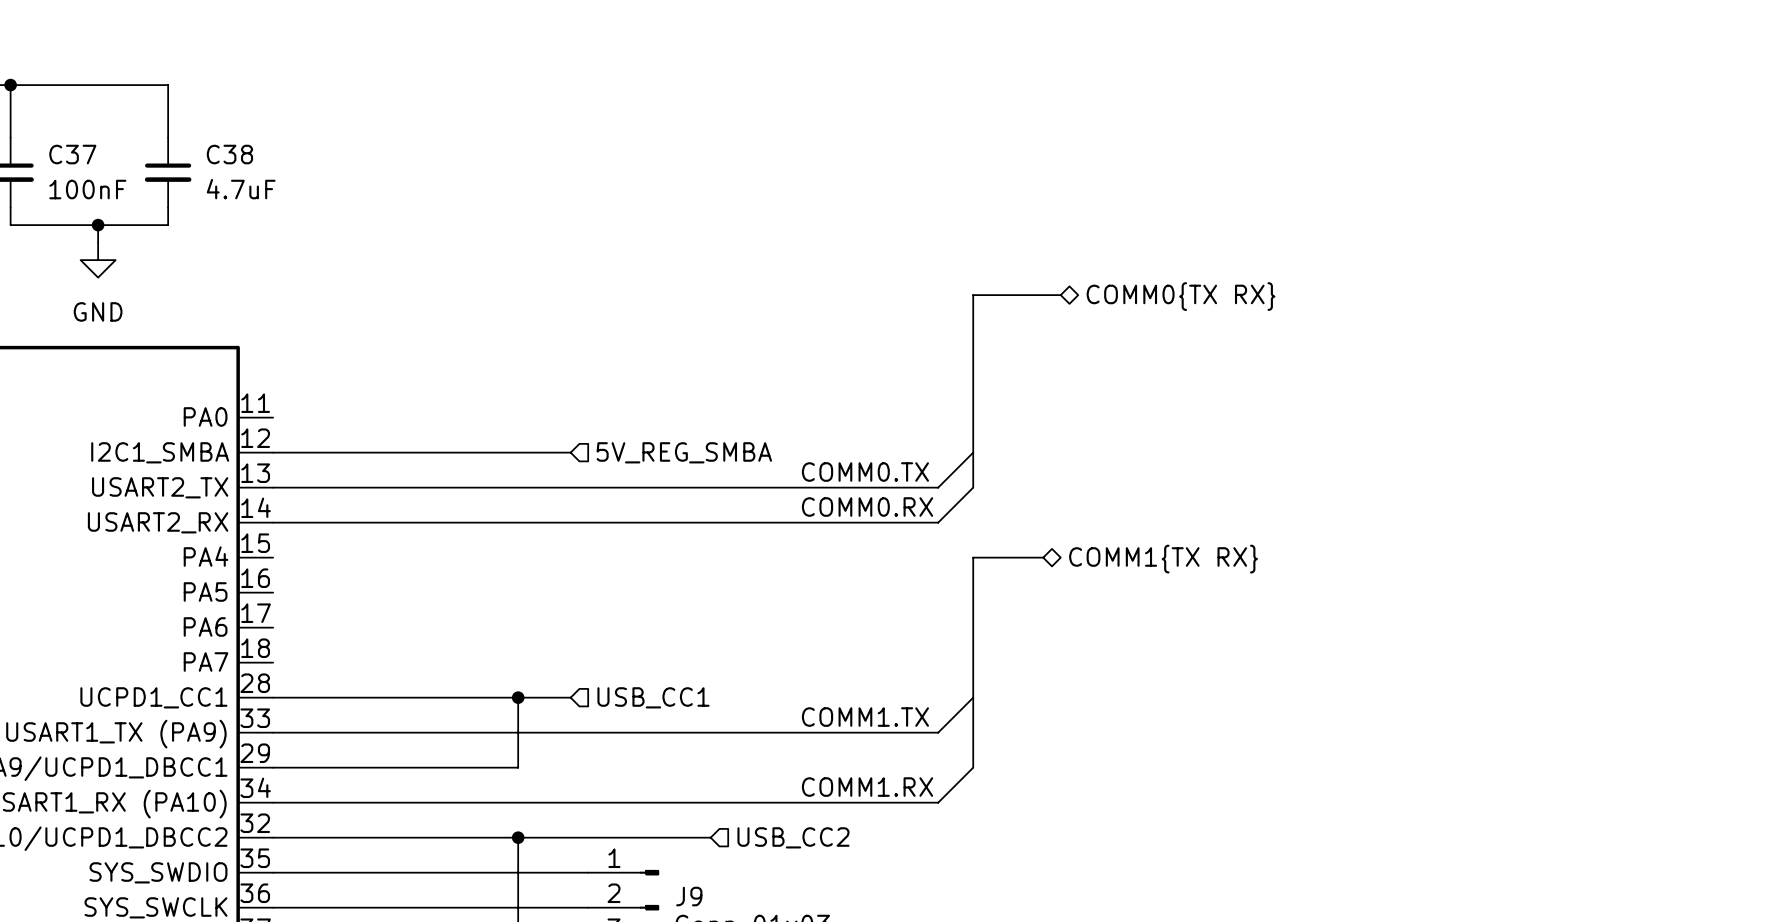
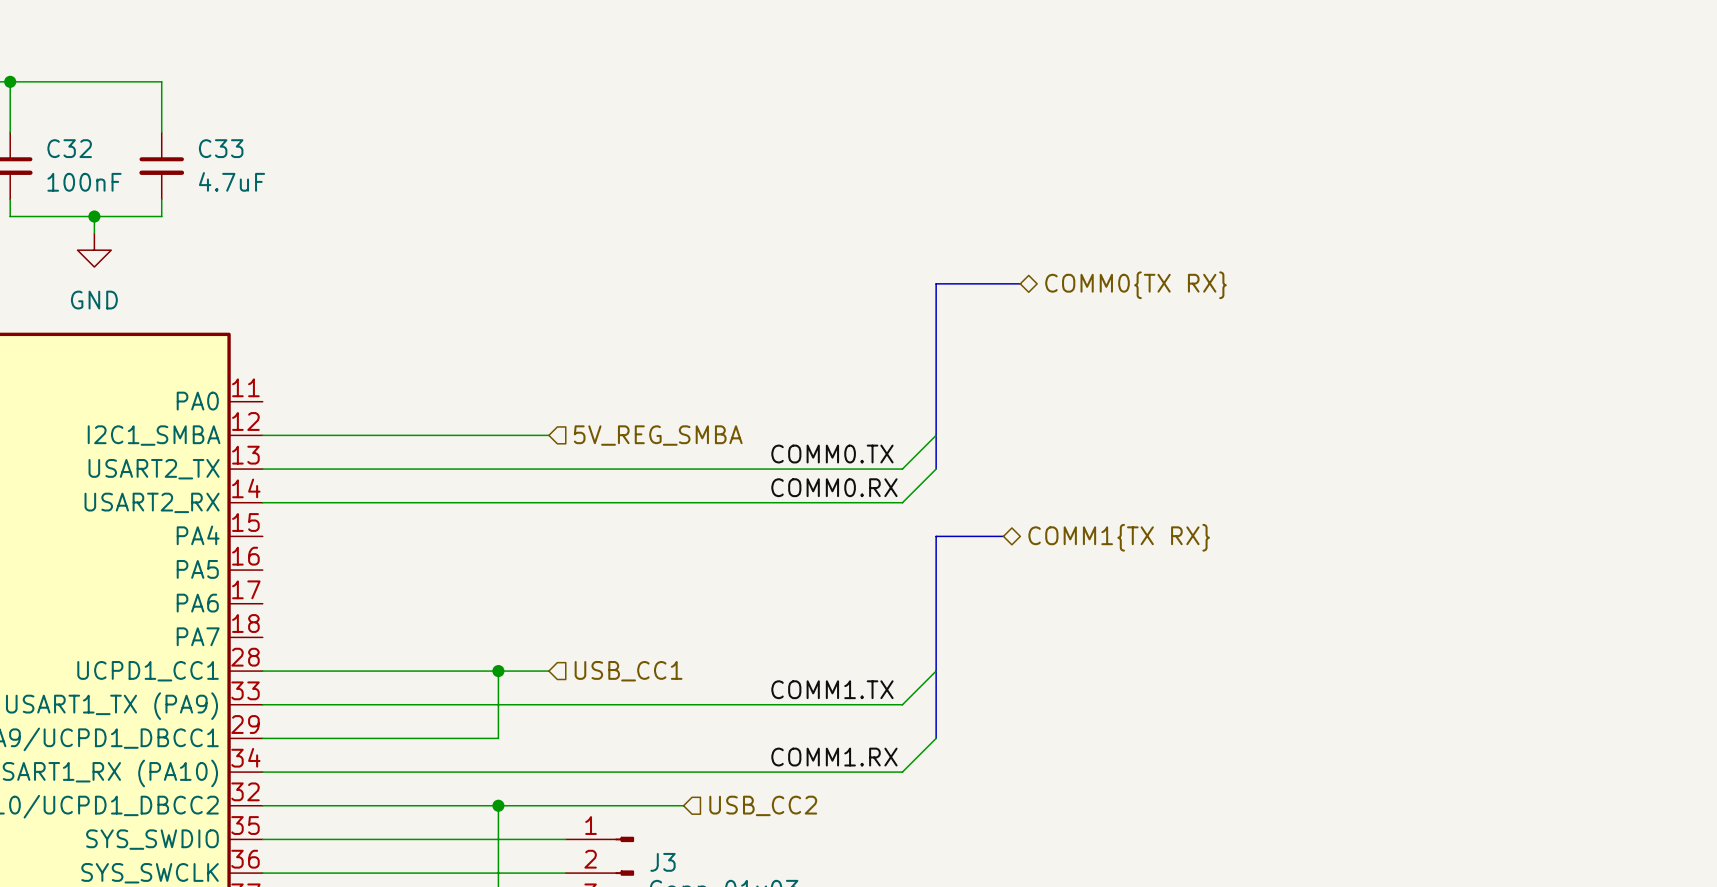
C37 name: C37 (72, 154) -> C32 (69, 148)
C38 name: C38 (229, 154) -> C33 (221, 148)
J9 name: J9 (689, 896) -> J3 (663, 862)

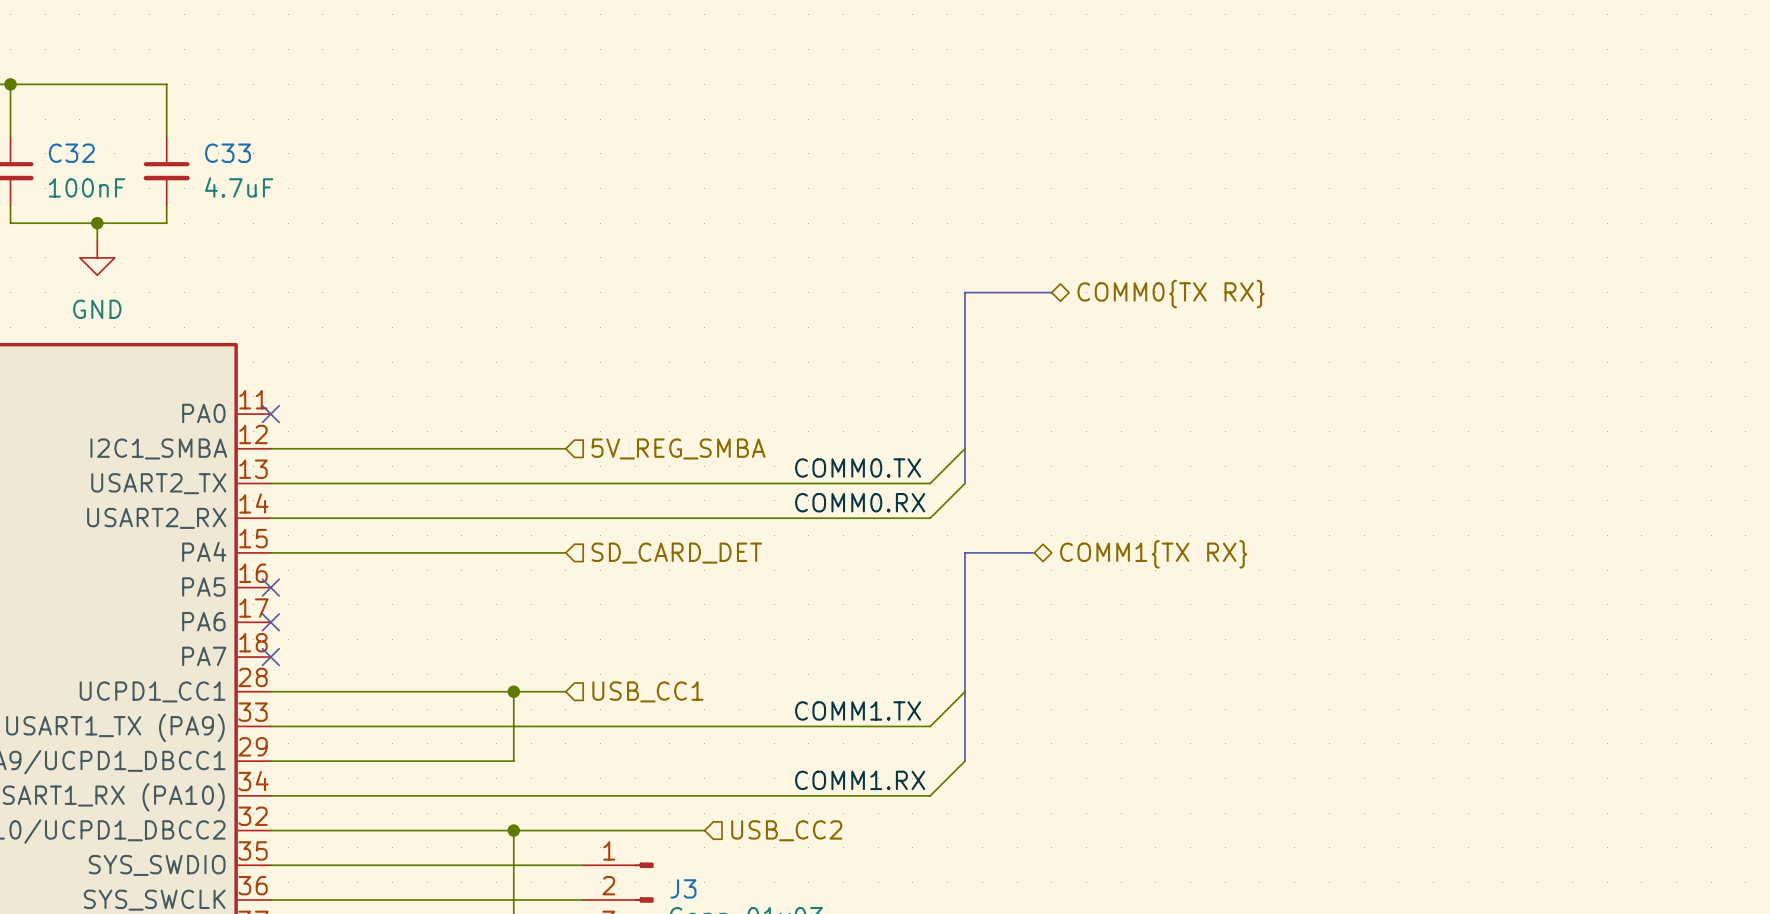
no-connect mark: none -> (270, 414)
wire: none -> (270, 552) (565, 552)
hierarchical label: none -> SD_CARD_DET (676, 553)
no-connect mark: none -> (270, 587)
no-connect mark: none -> (270, 622)
no-connect mark: none -> (270, 657)

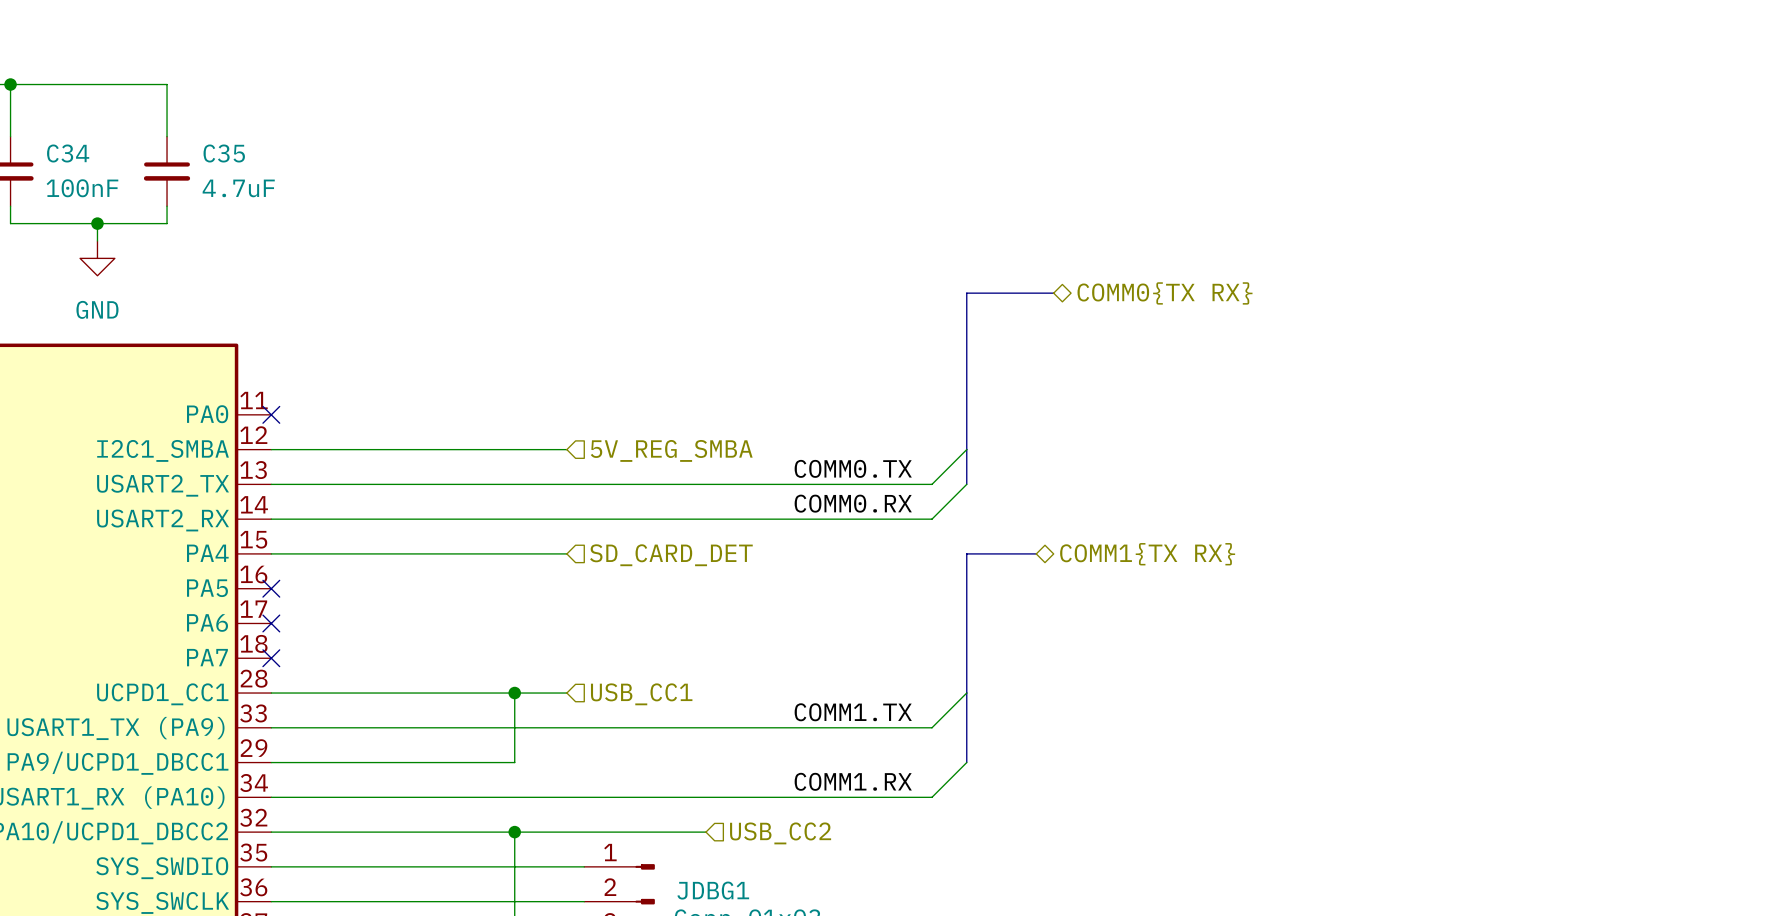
C32 name: C32 (71, 153) -> C34 (68, 153)
C33 name: C33 (227, 153) -> C35 (224, 153)
J3 name: J3 (683, 888) -> JDBG1 (713, 890)

